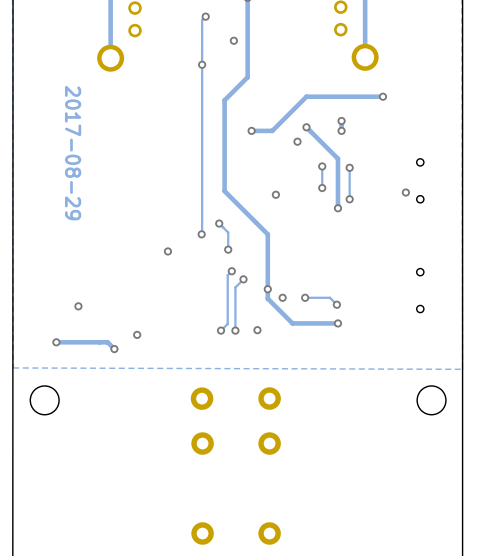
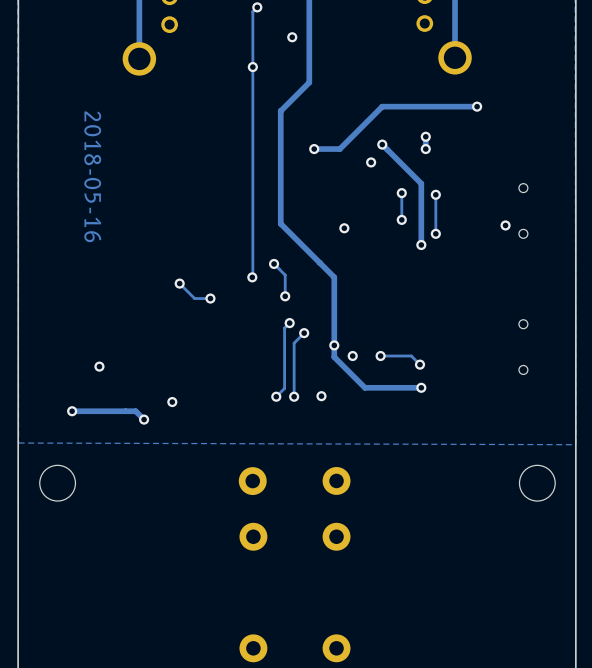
text: 2017-08-29 (73, 153) -> 2018-05-16 (92, 176)
track: none -> (179, 283) (194, 298) (210, 298)
via: none -> (179, 283)

